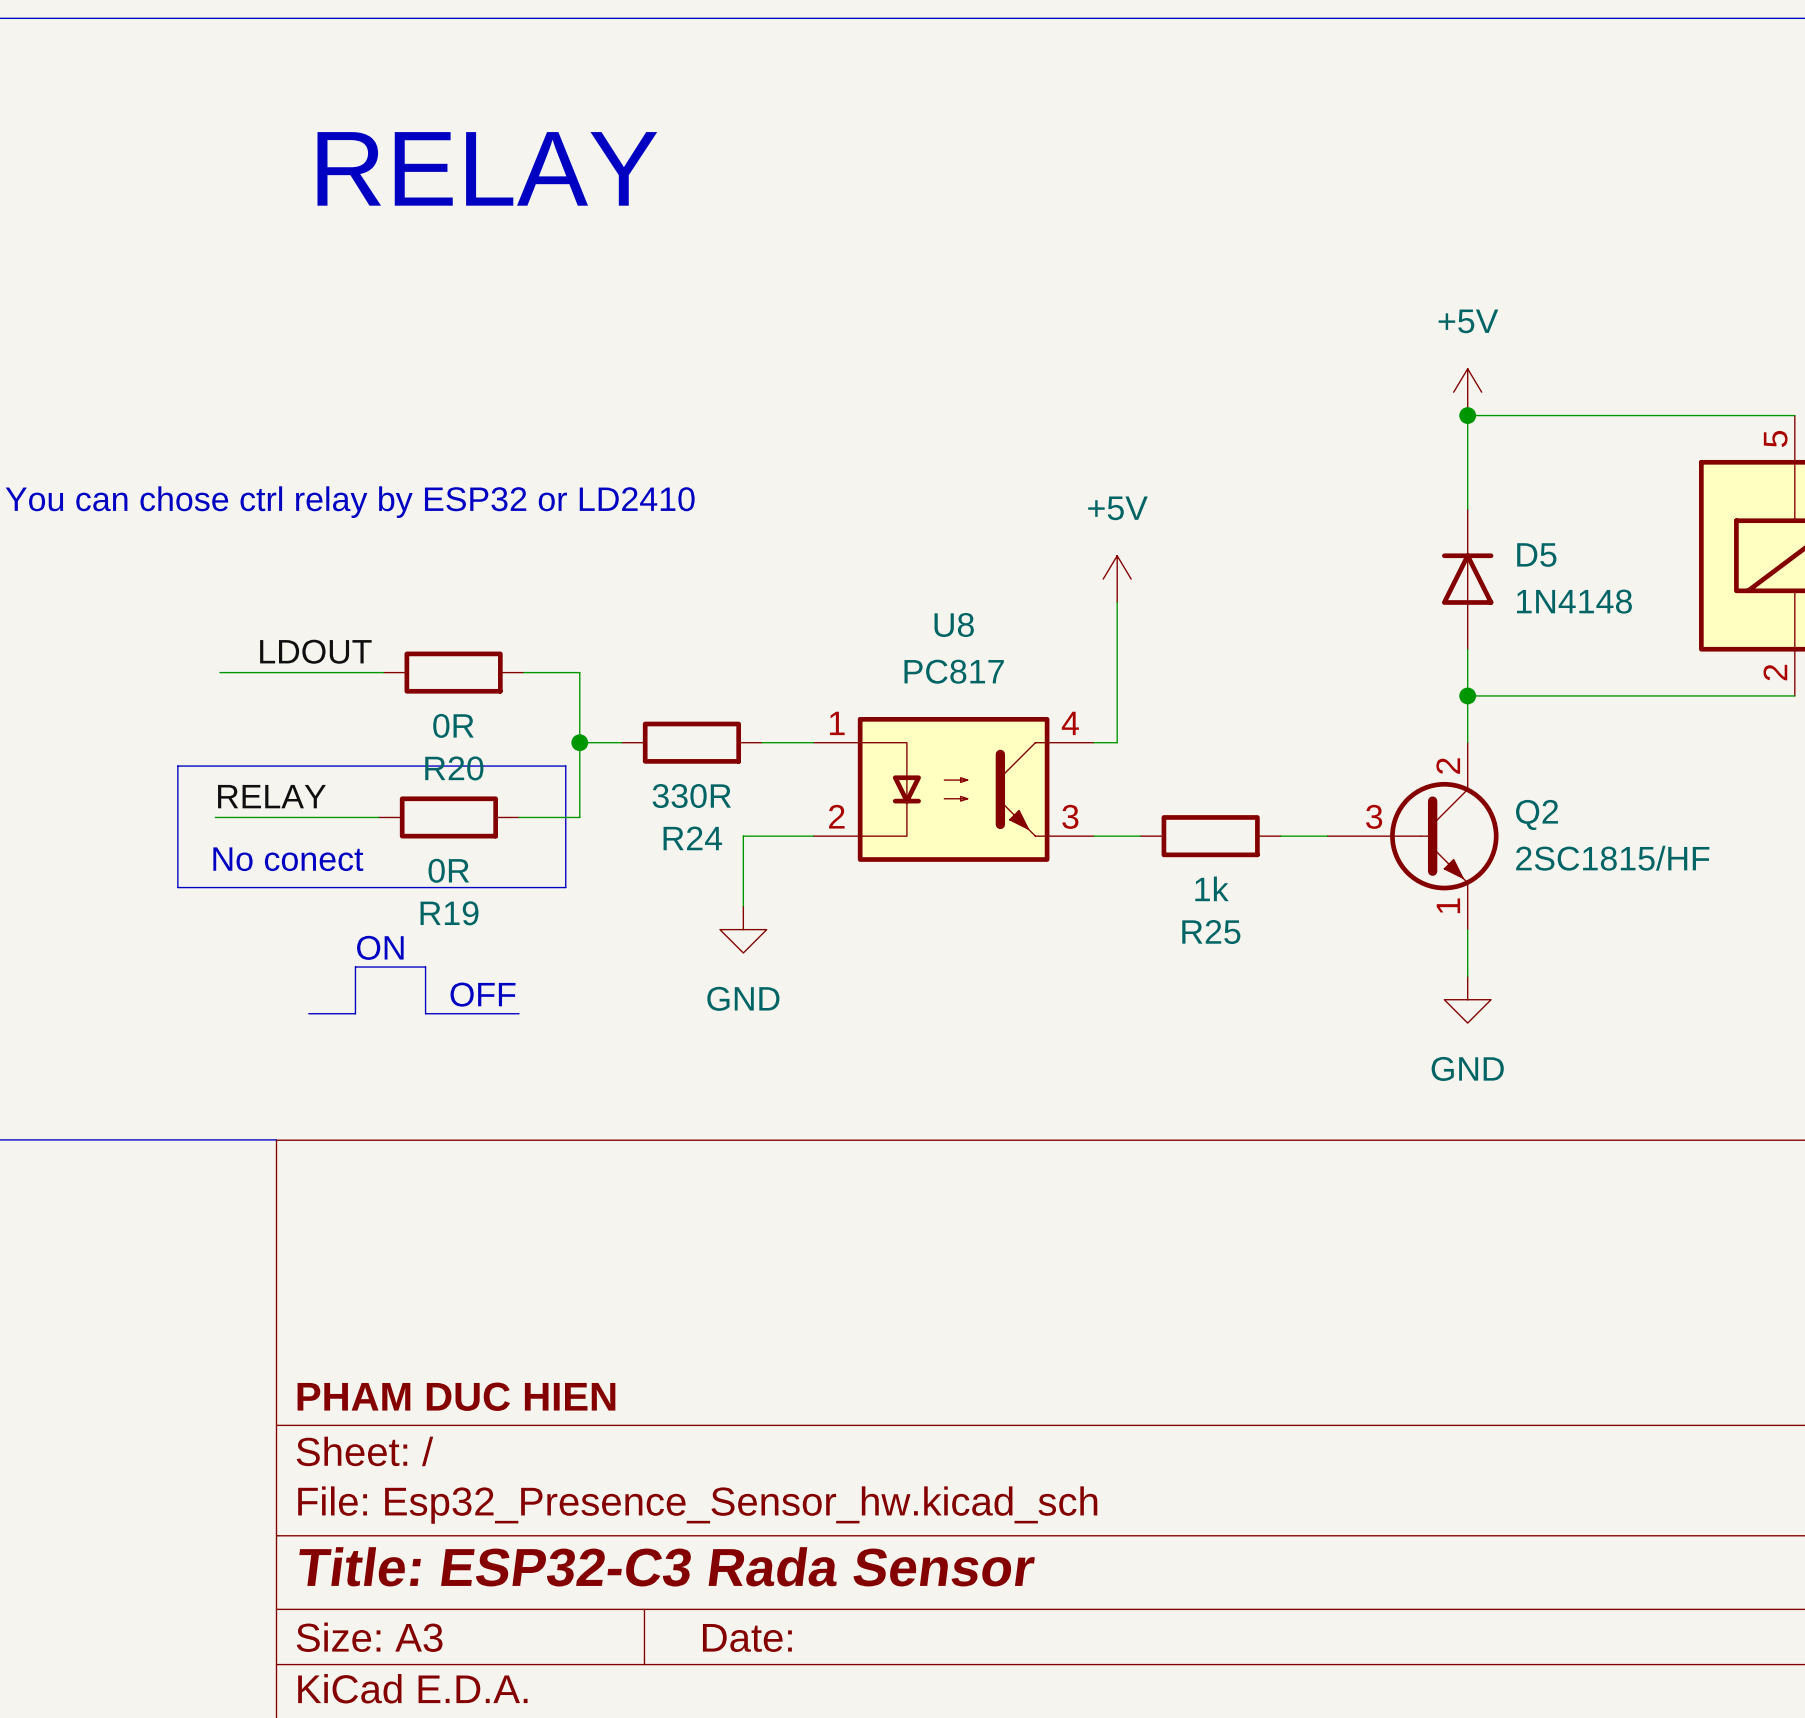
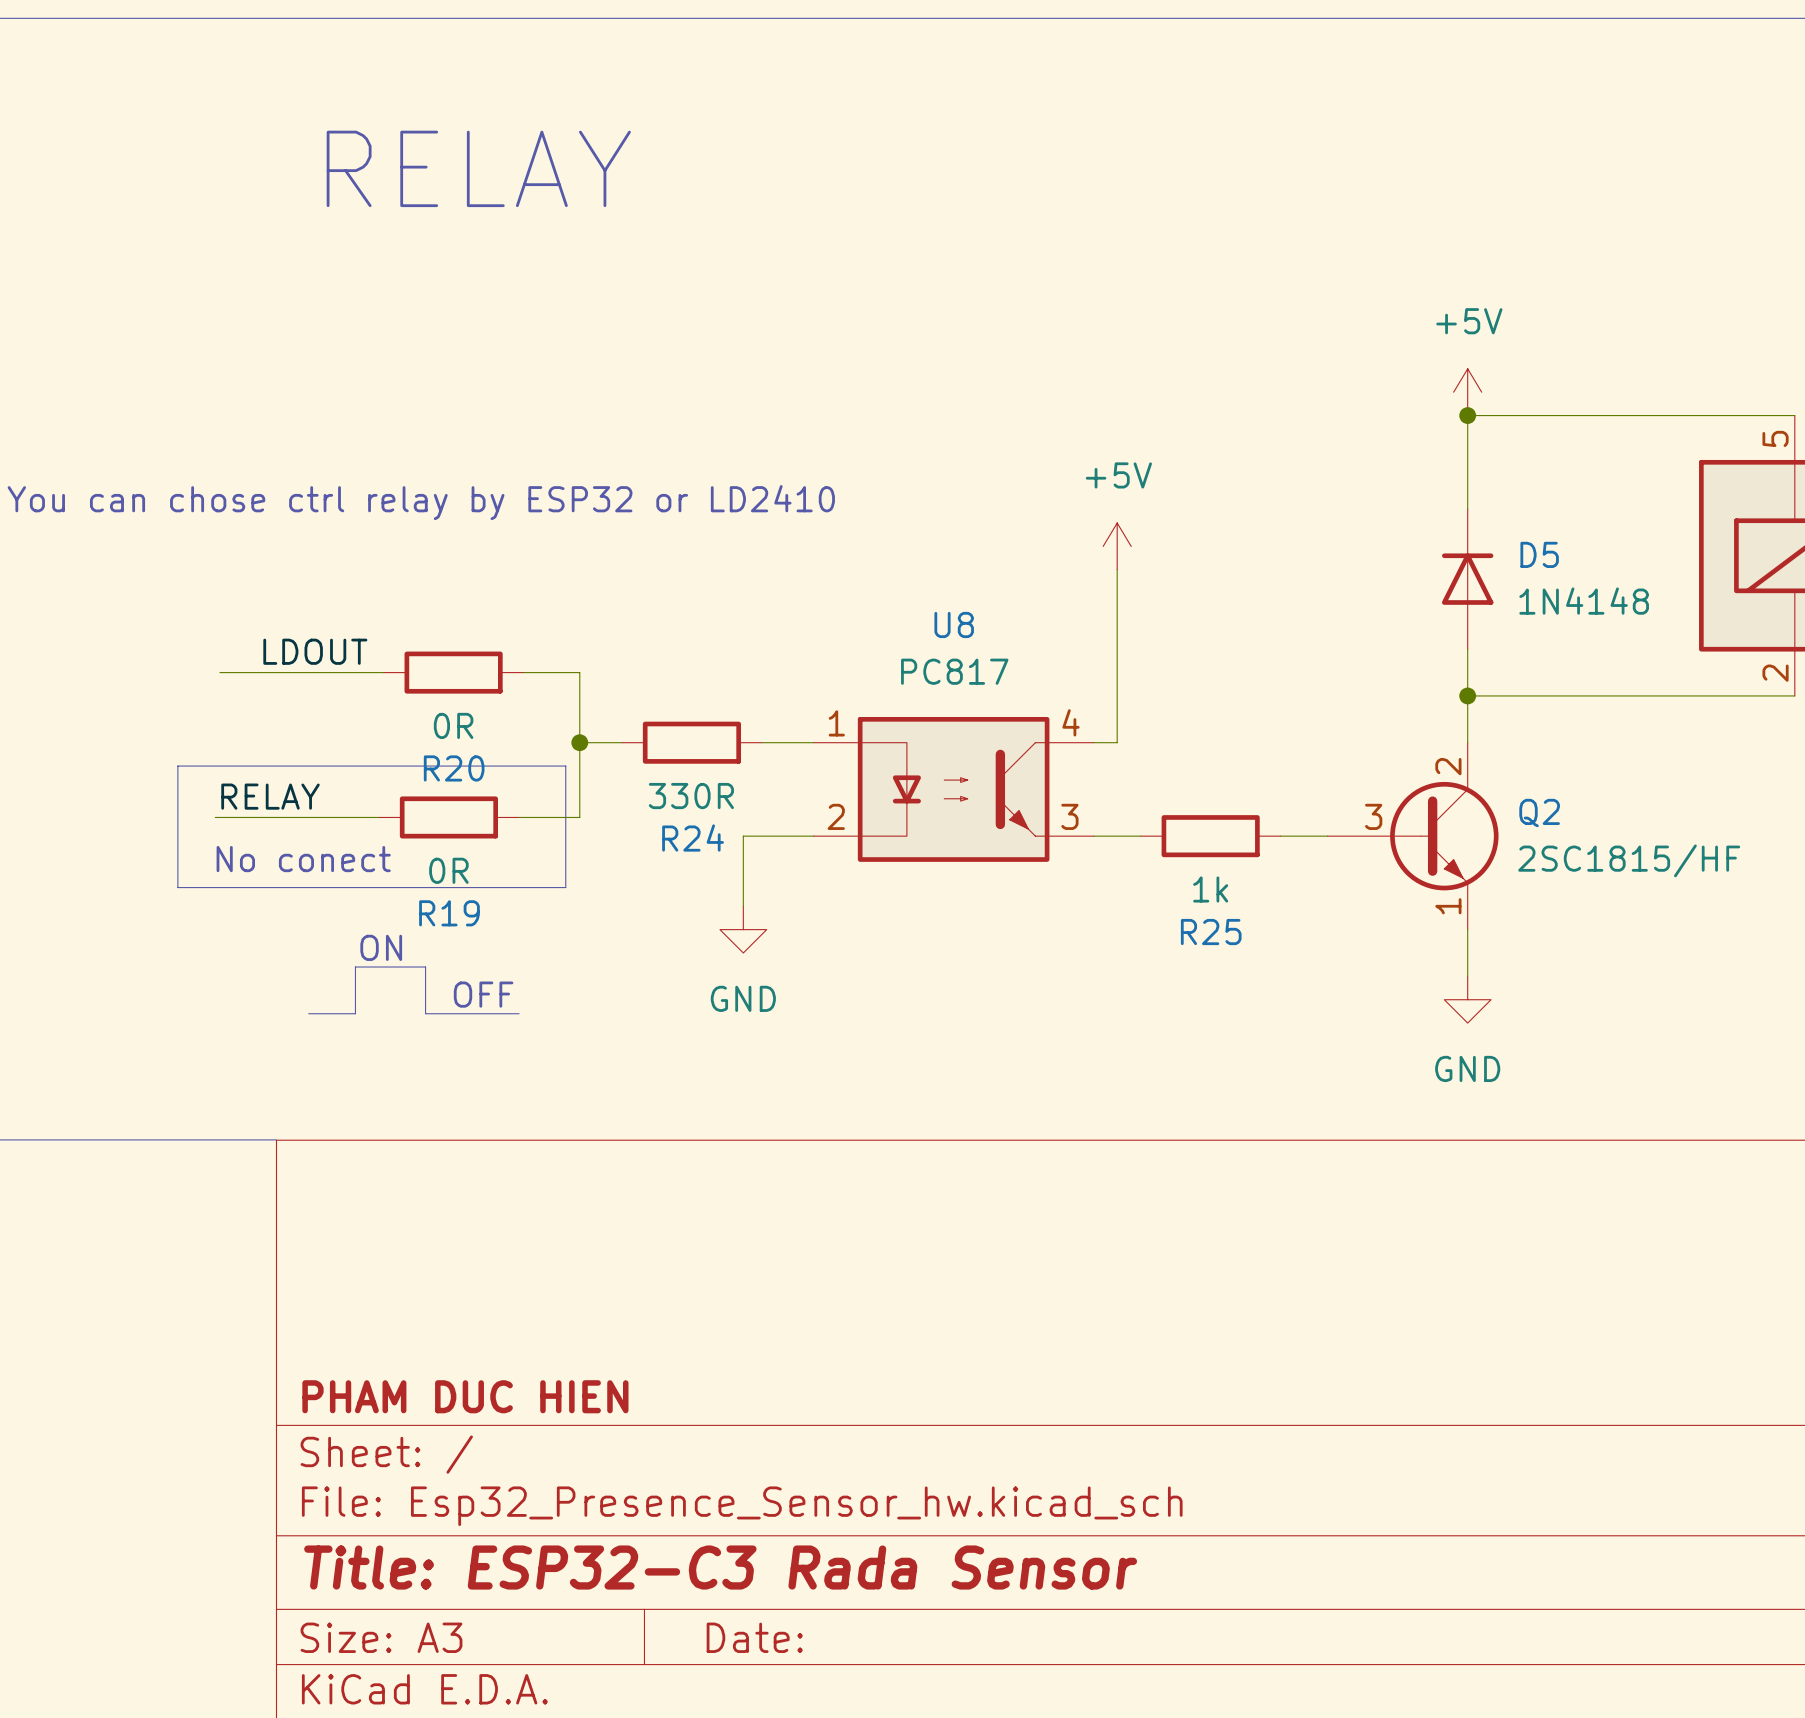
power symbol position: +5V (1117, 579) -> +5V (1117, 546)

